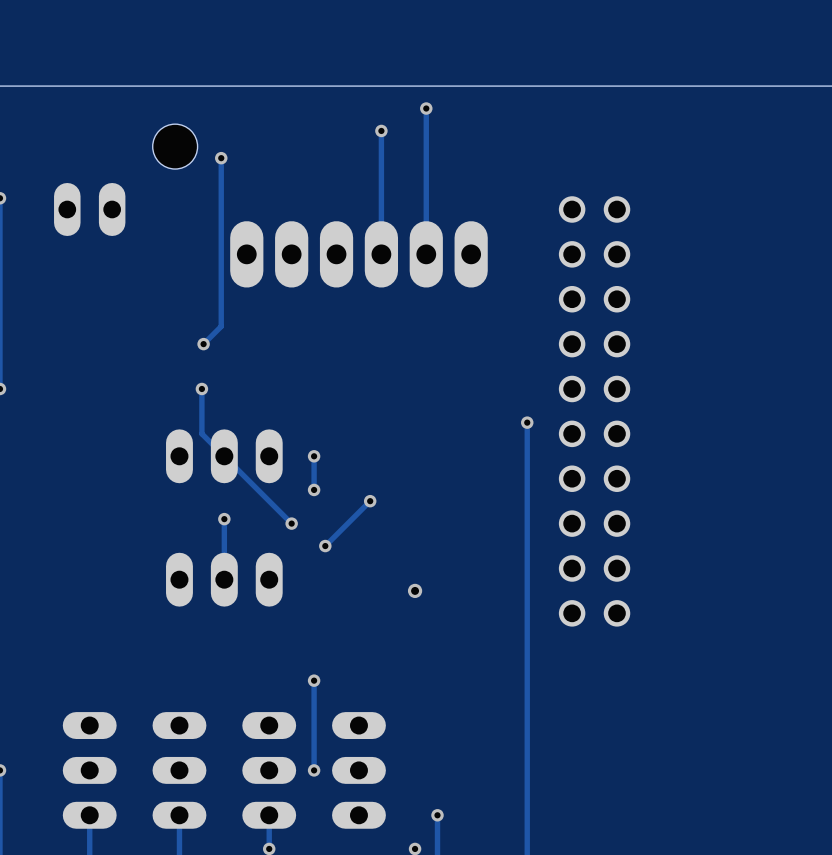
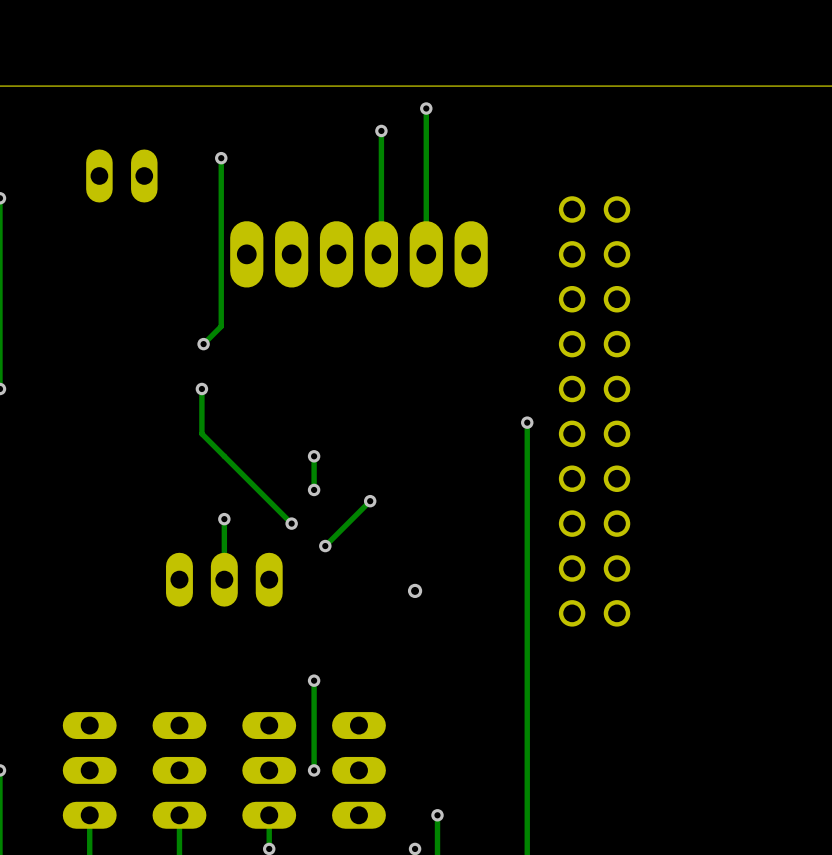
part: (175, 146) -> none
part position: (89, 209) -> (121, 175)
part: (224, 456) -> none

